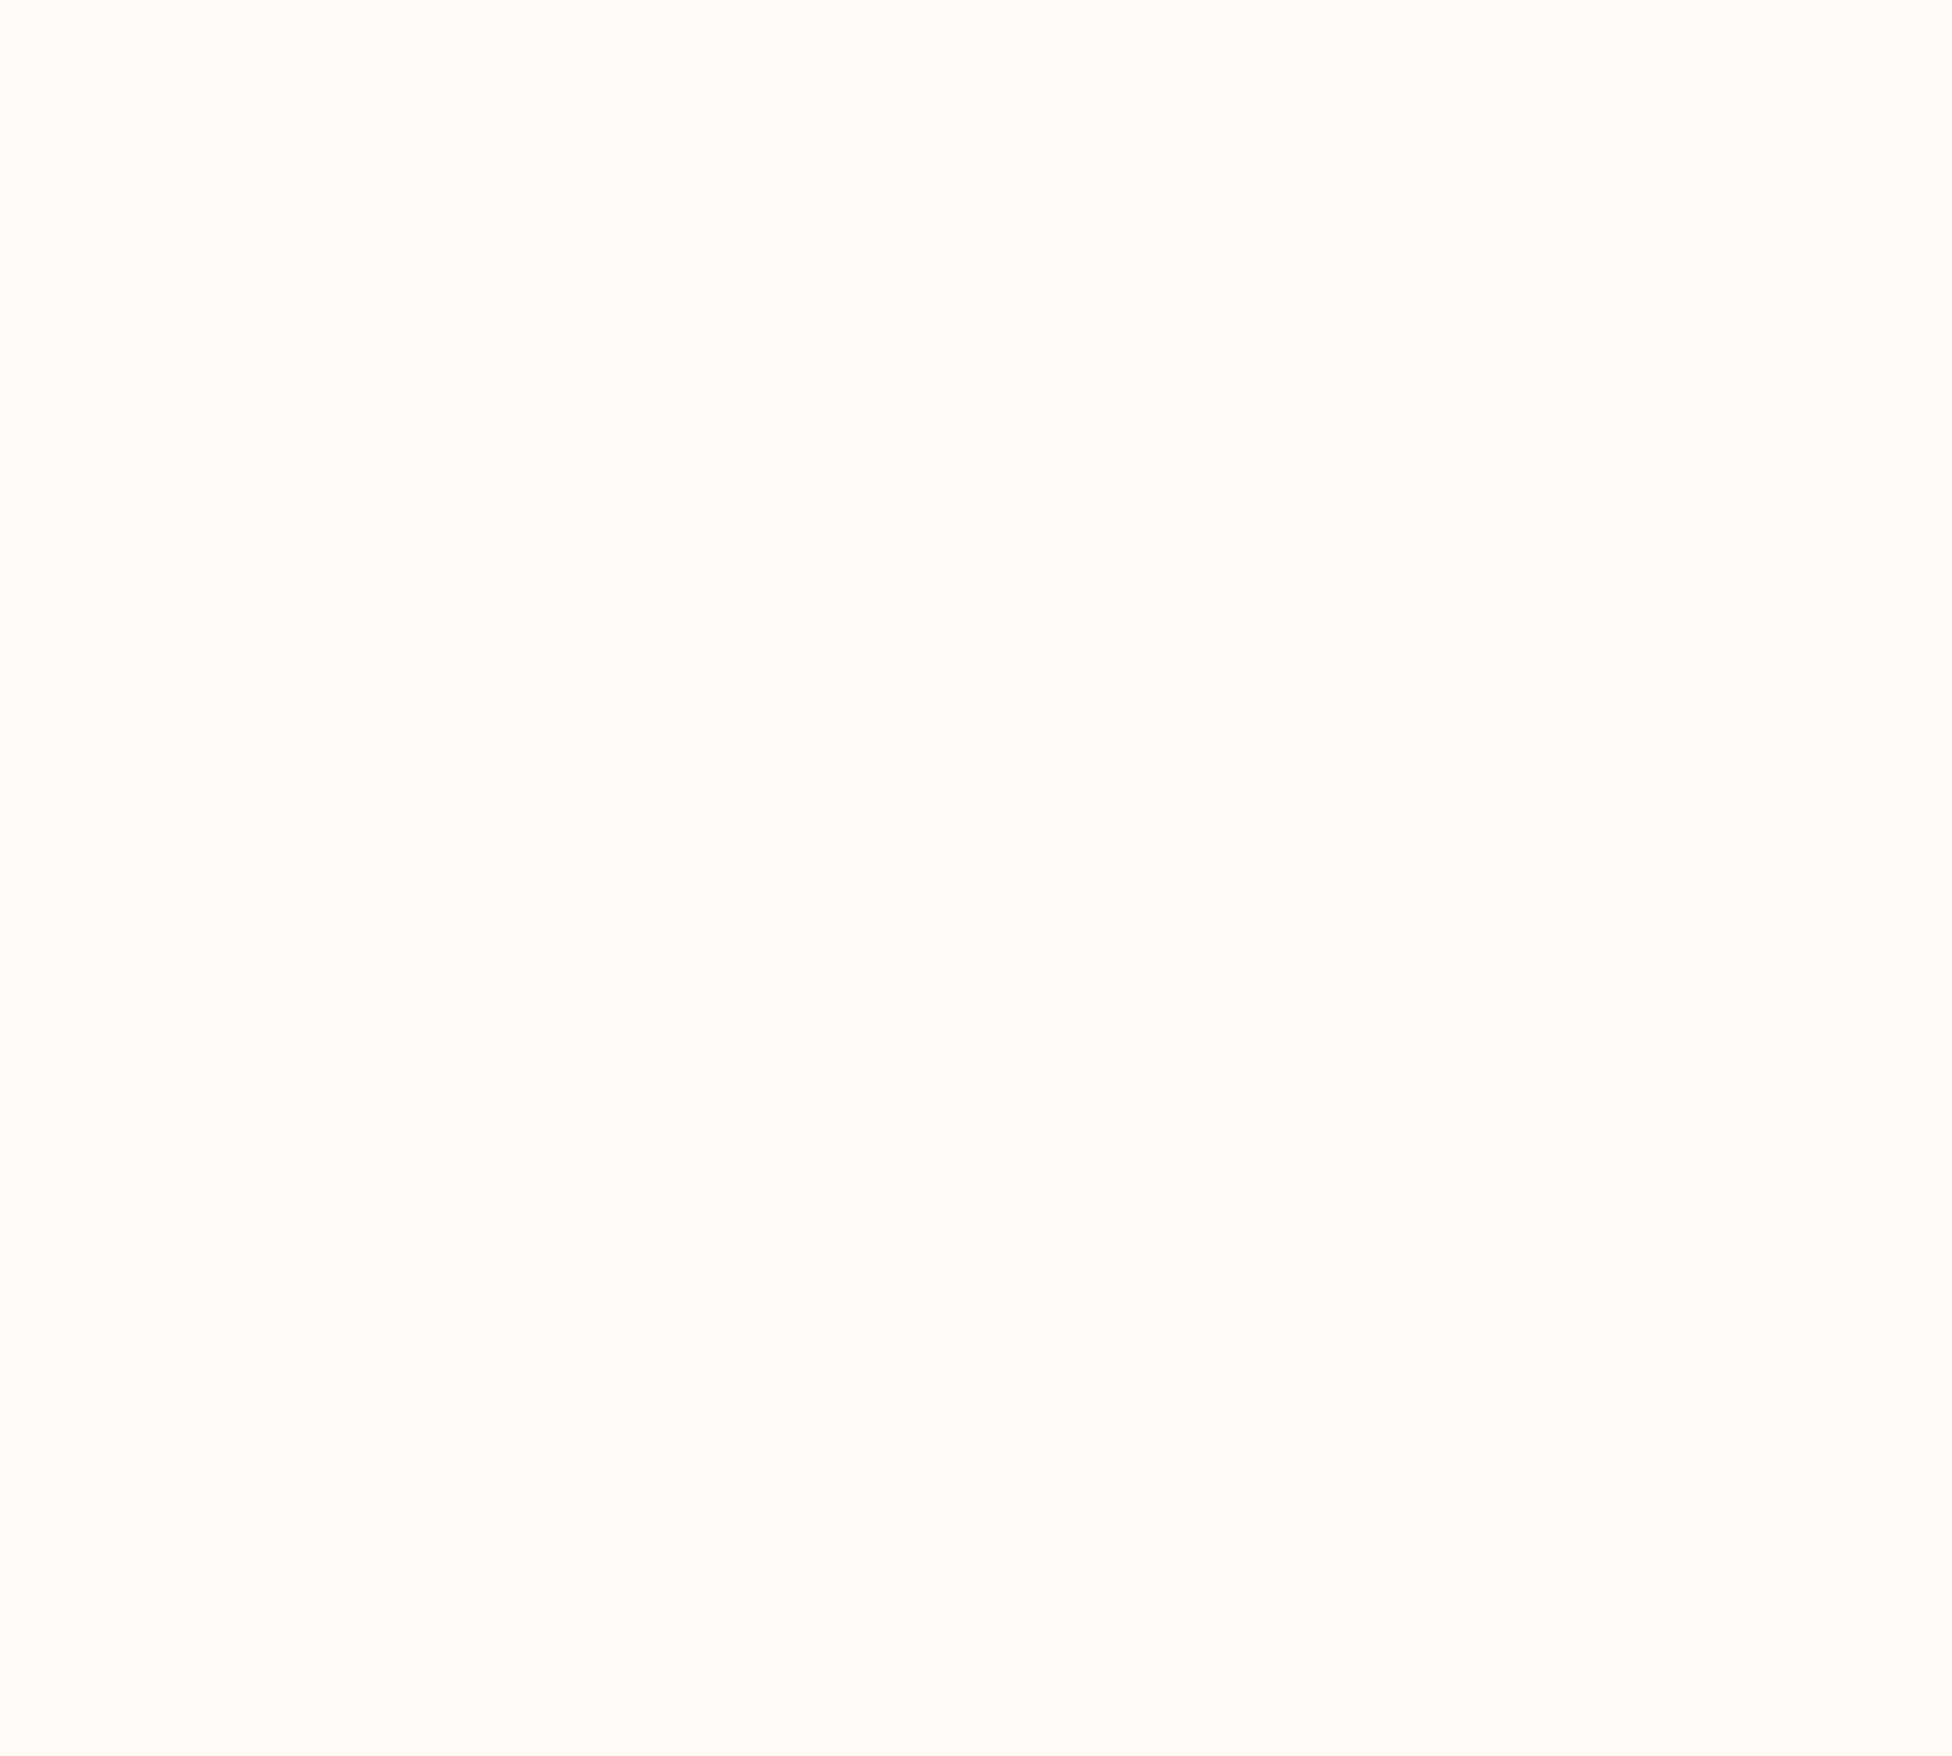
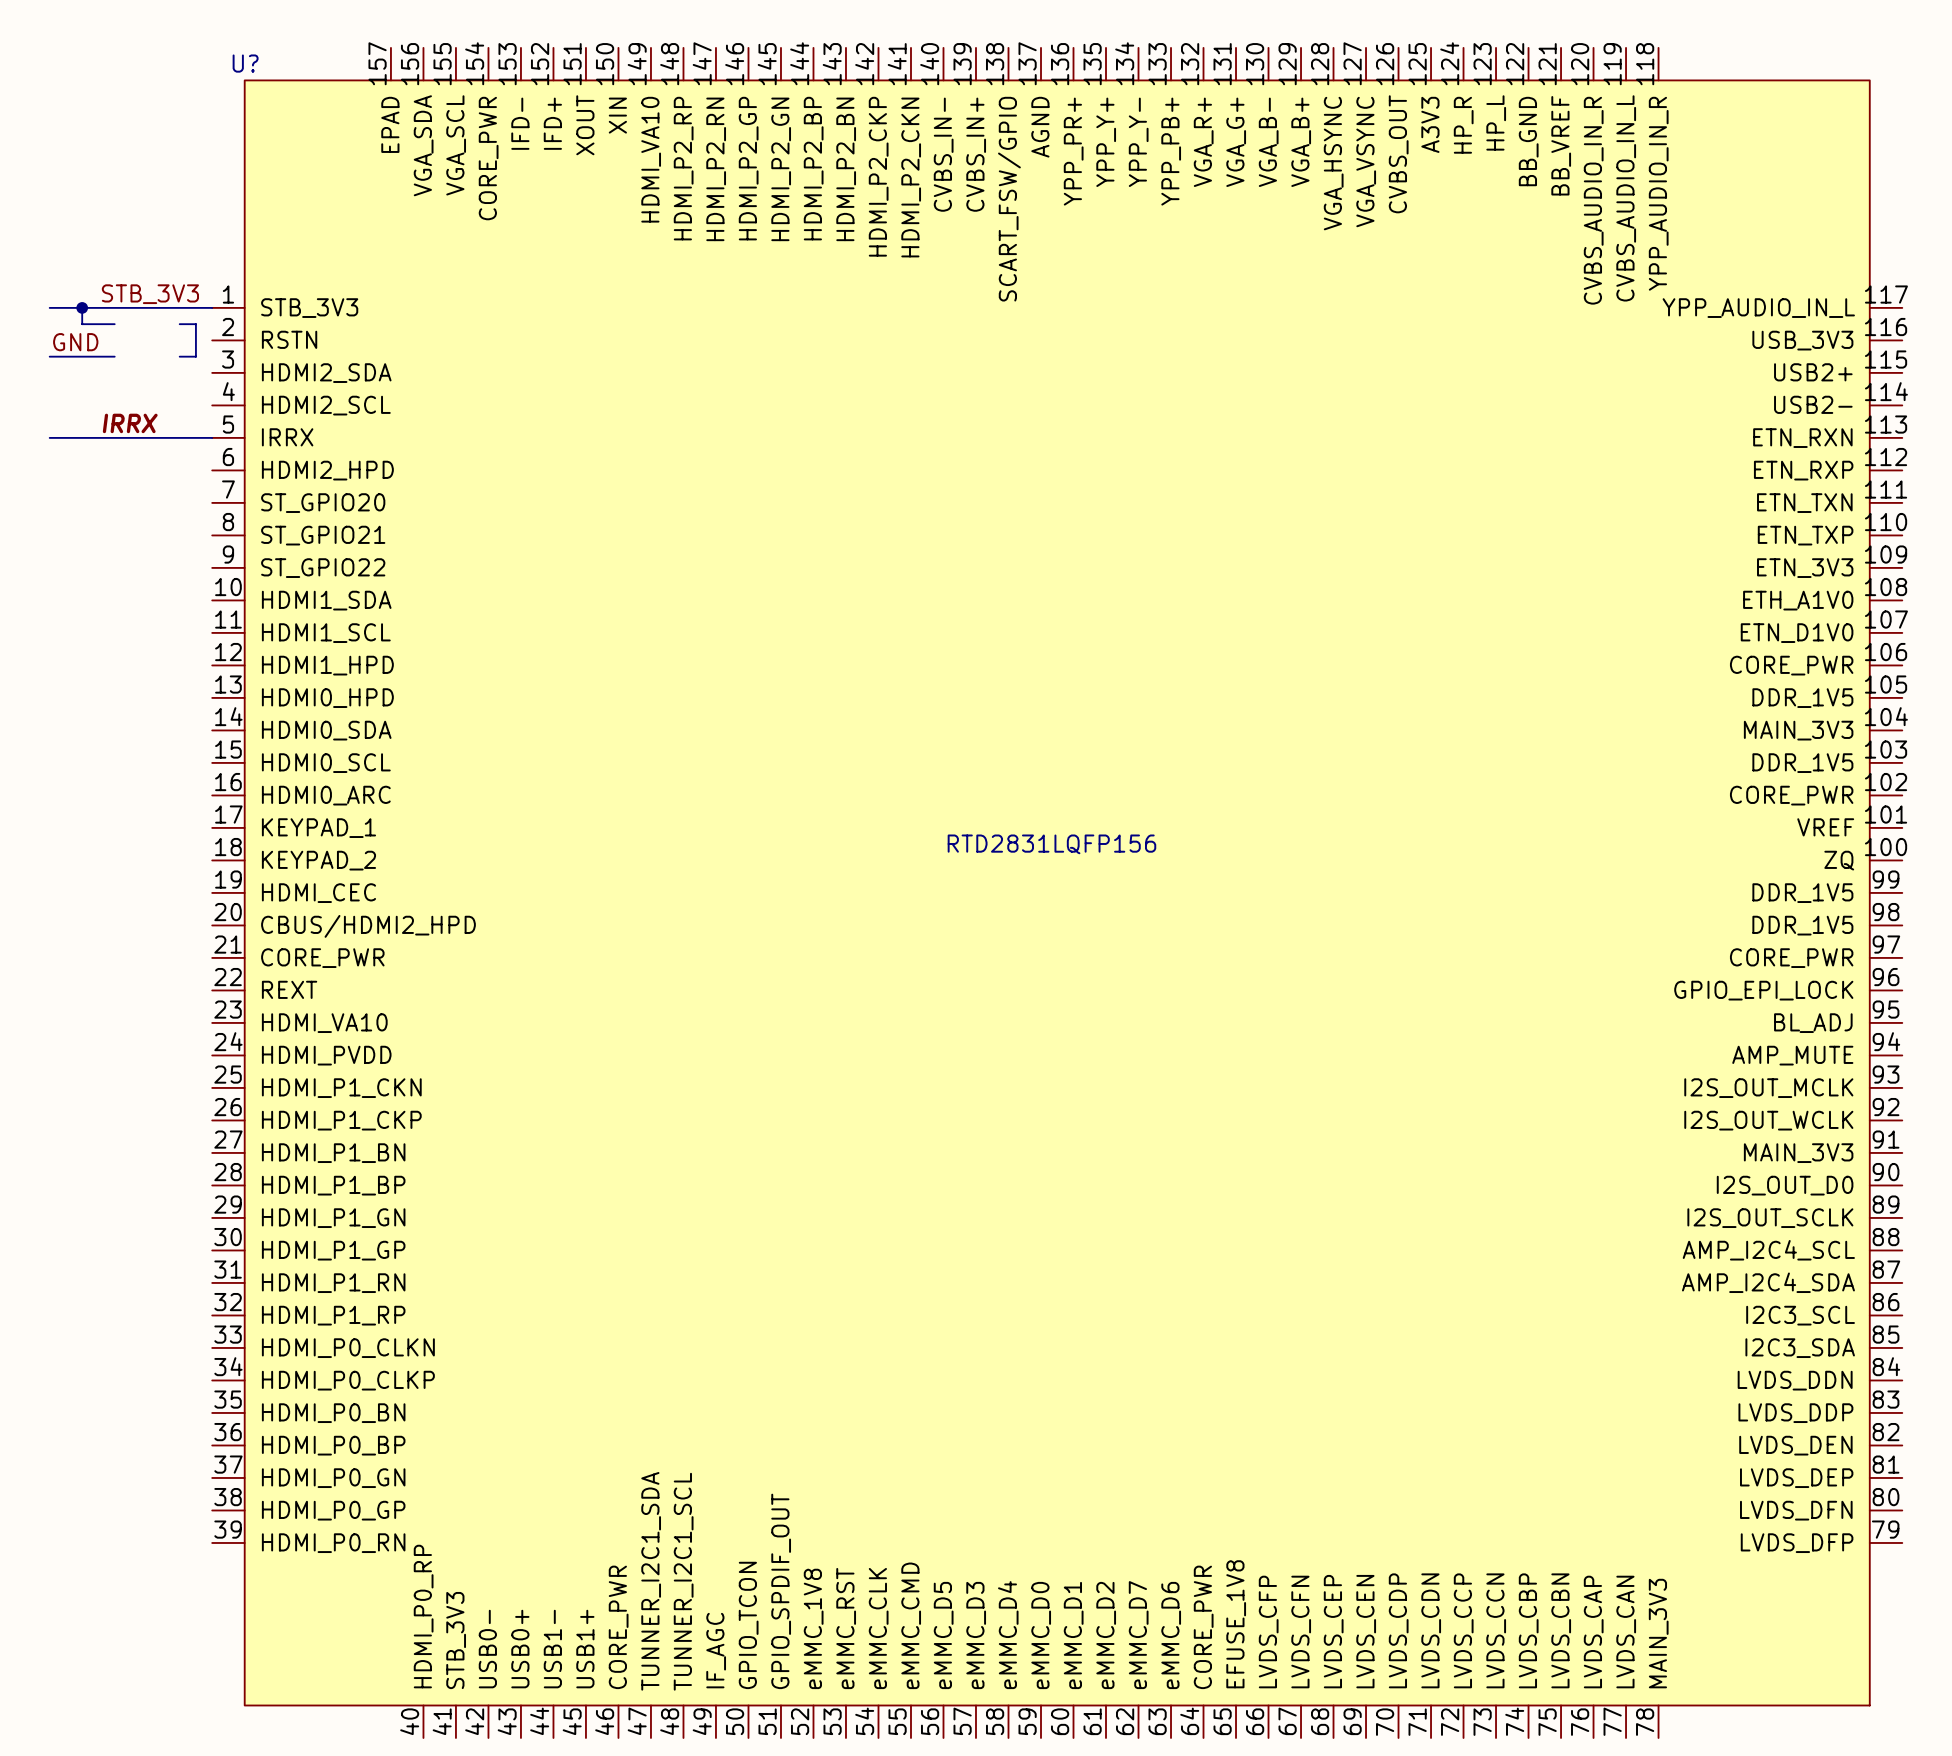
label: none -> STB_3V3 (150, 294)
wire: none -> (49, 307) (212, 307)
wire: none -> (82, 307) (82, 324) (114, 324)
junction: none -> (82, 307)
wire: none -> (179, 324) (195, 324) (195, 356) (179, 356)
label: none -> GND (75, 342)
wire: none -> (49, 356) (114, 356)
label: none -> IRRX (130, 423)
wire: none -> (49, 437) (212, 437)
U?: none -> RTD2831LQFP156 (1057, 892)

